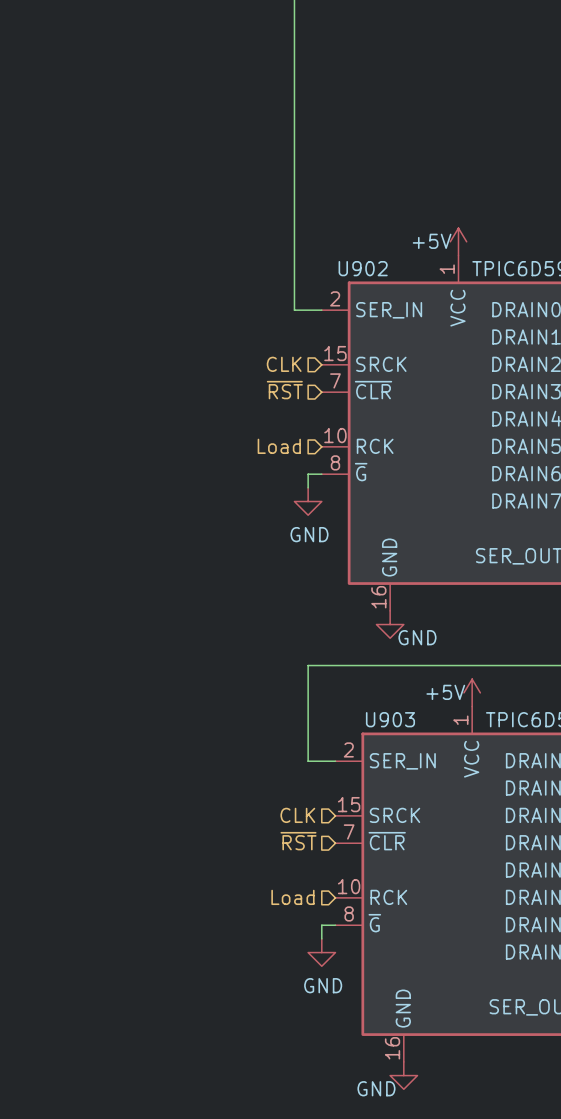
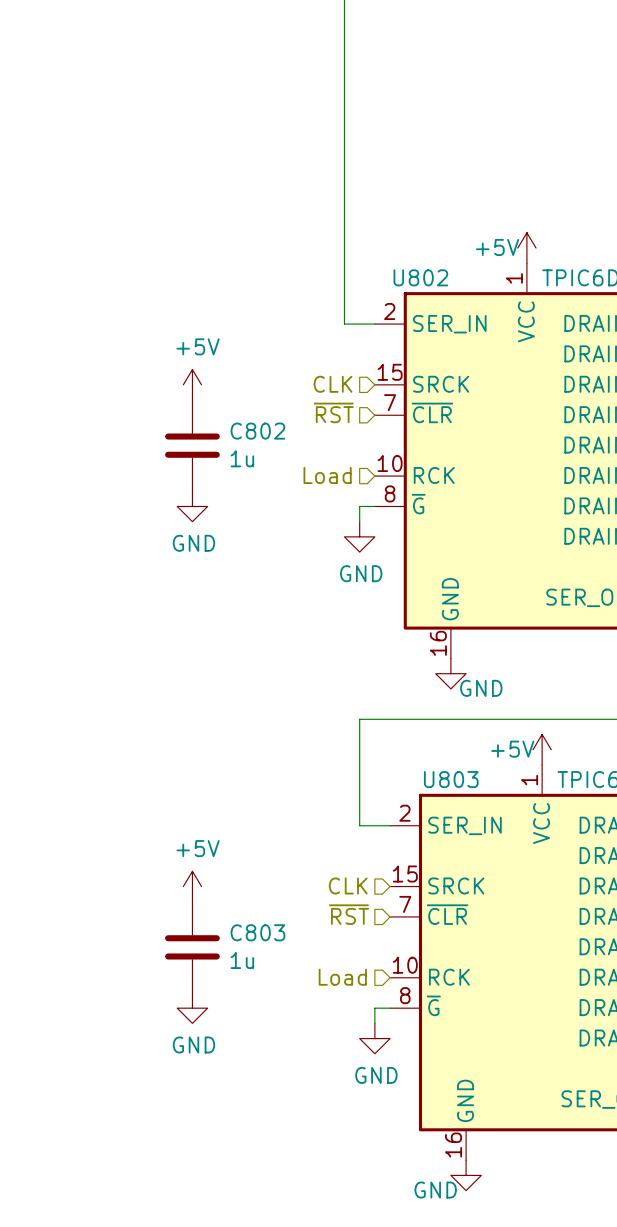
U902 name: U902 (363, 268) -> U802 (420, 277)
power symbol: none -> +5V (192, 384)
C802: none -> 1u (192, 445)
power symbol: none -> GND (192, 506)
U903 name: U903 (390, 719) -> U803 (451, 779)
power symbol: none -> +5V (192, 886)
C803: none -> 1u (192, 947)
power symbol: none -> GND (192, 1008)

